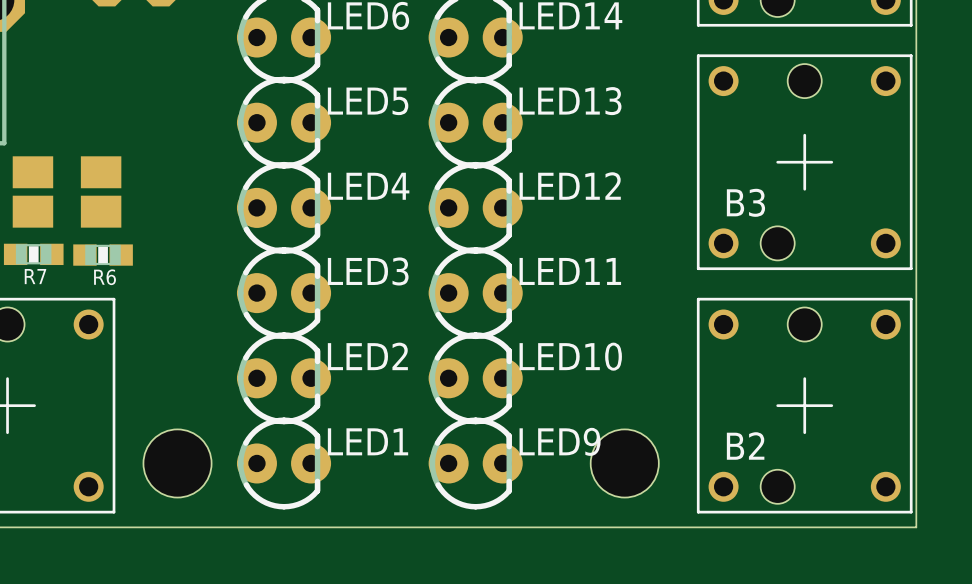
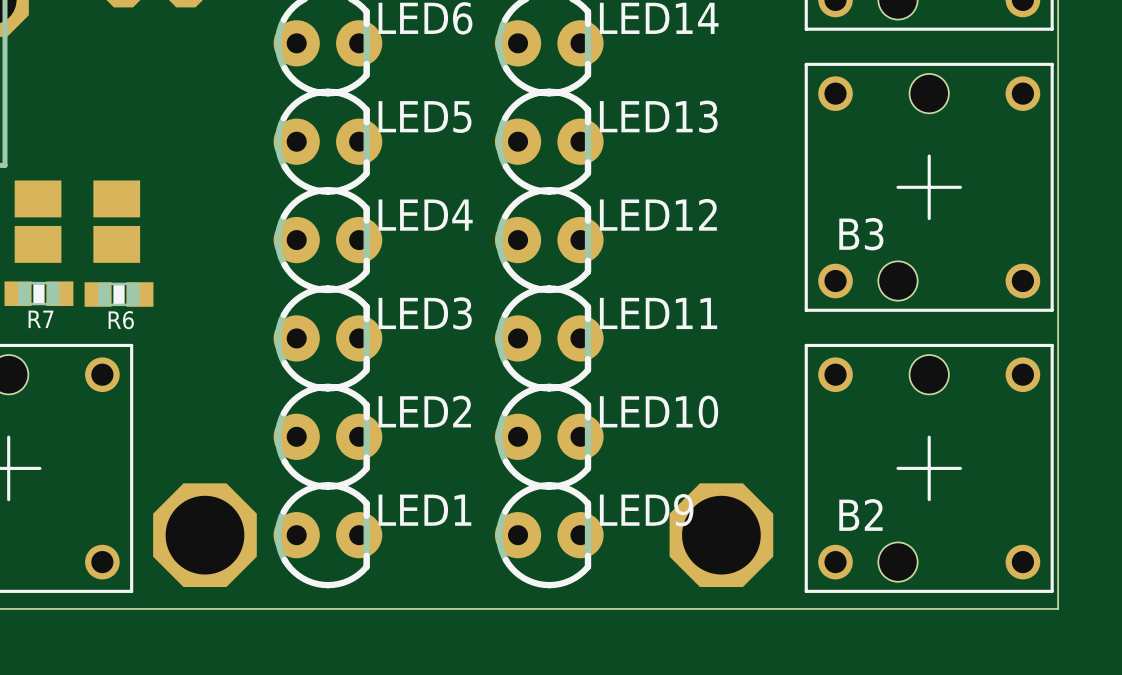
hole: (177, 463) -> none
part: none -> (204, 535)
hole: (624, 463) -> none
part: none -> (721, 535)

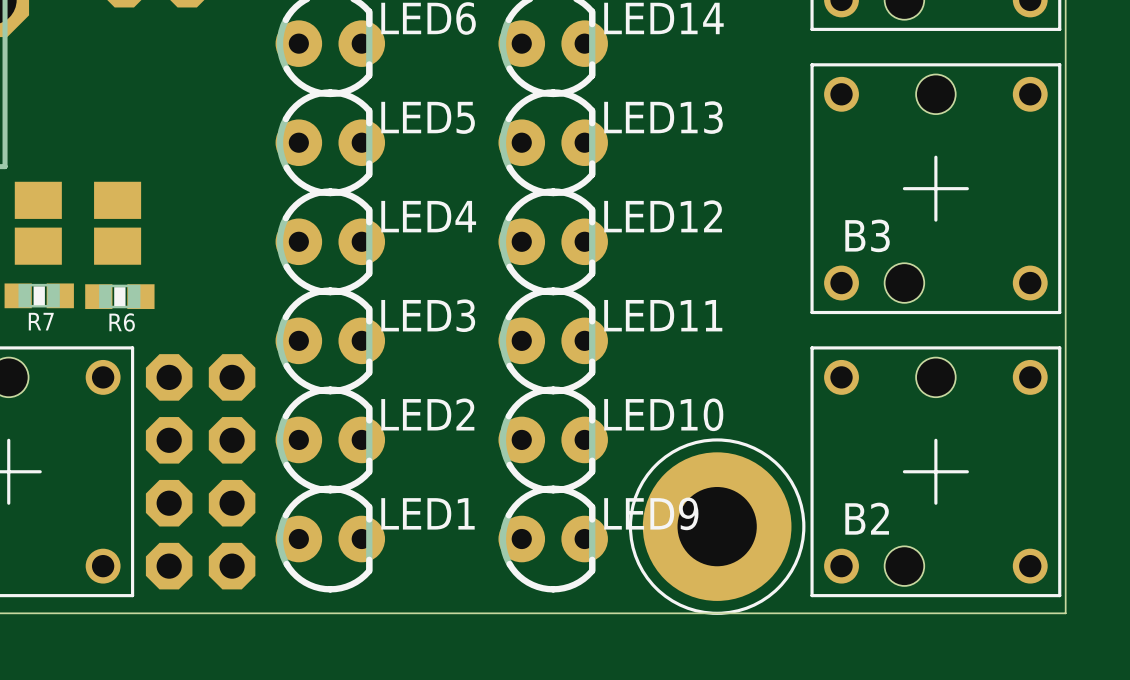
part: none -> (200, 471)
part footprint: [669, 483, 774, 588] -> [628, 438, 806, 615]
part: (204, 535) -> none

